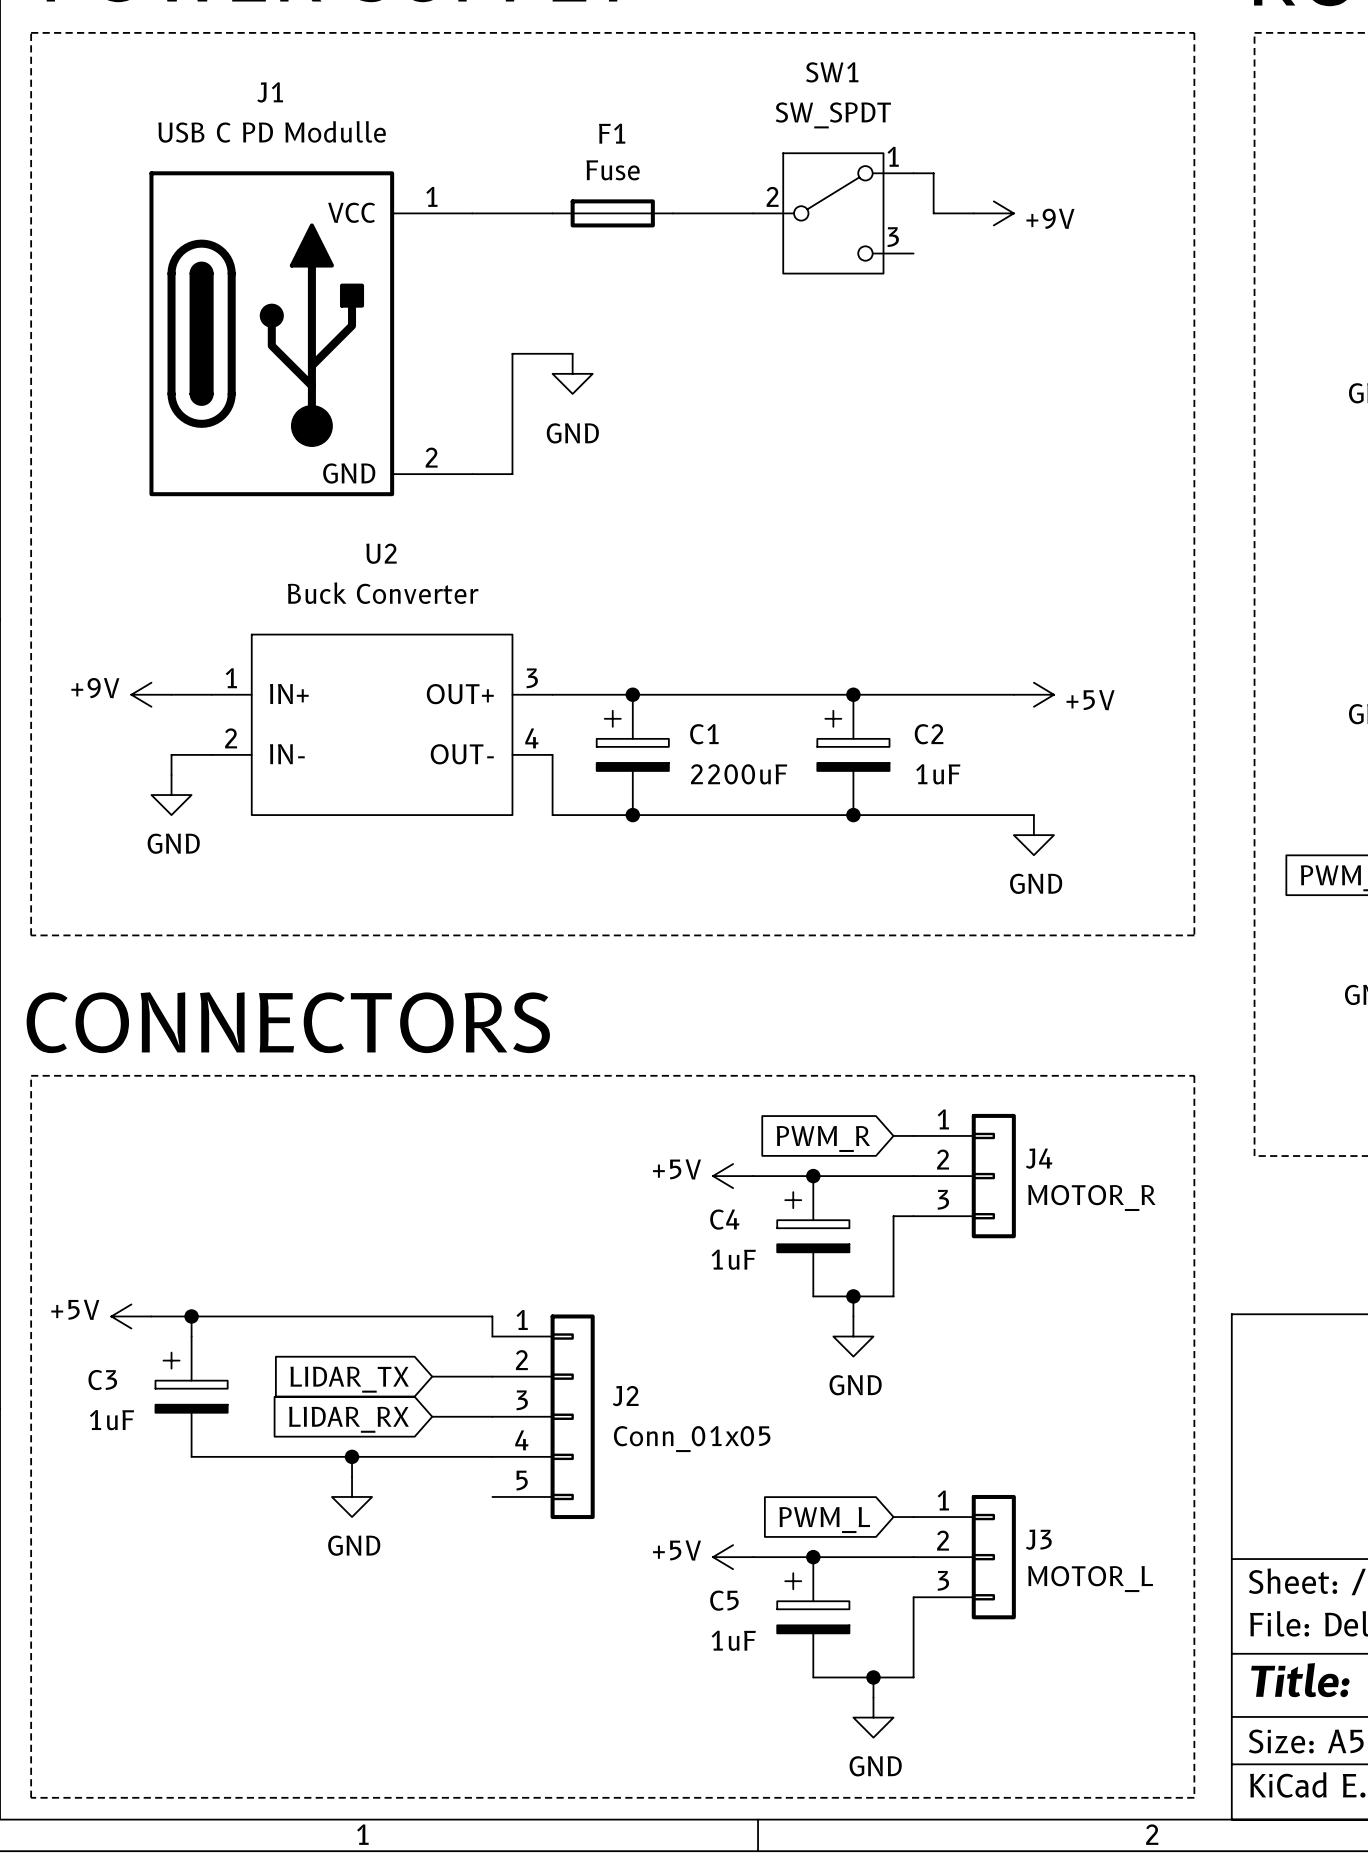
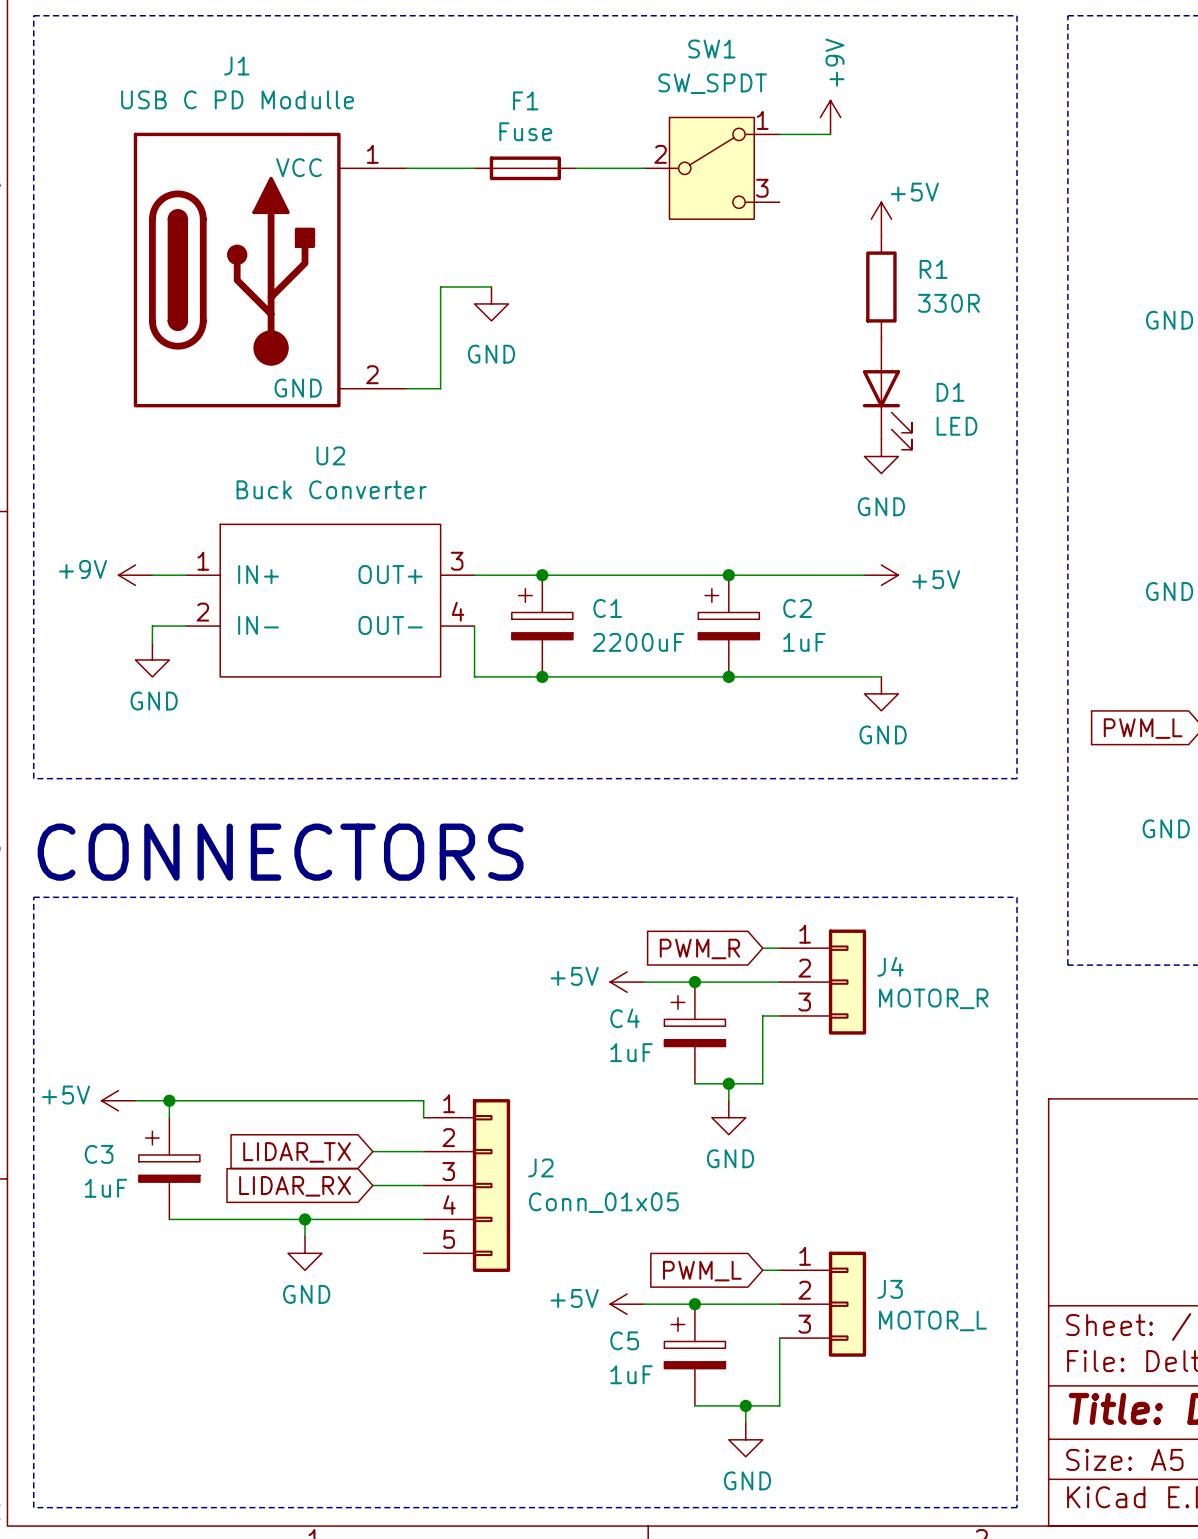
wire: (933, 173) (933, 213) (973, 213) -> (796, 134) (830, 134)
power symbol rotation: 0° (993, 213) -> 90° counterclockwise (830, 117)
power symbol position: +9V (993, 213) -> +9V (830, 117)
power symbol: none -> +5V (881, 219)
R1: none -> 330R (881, 287)
D1: none -> LED (887, 393)
power symbol: none -> GND (881, 456)

